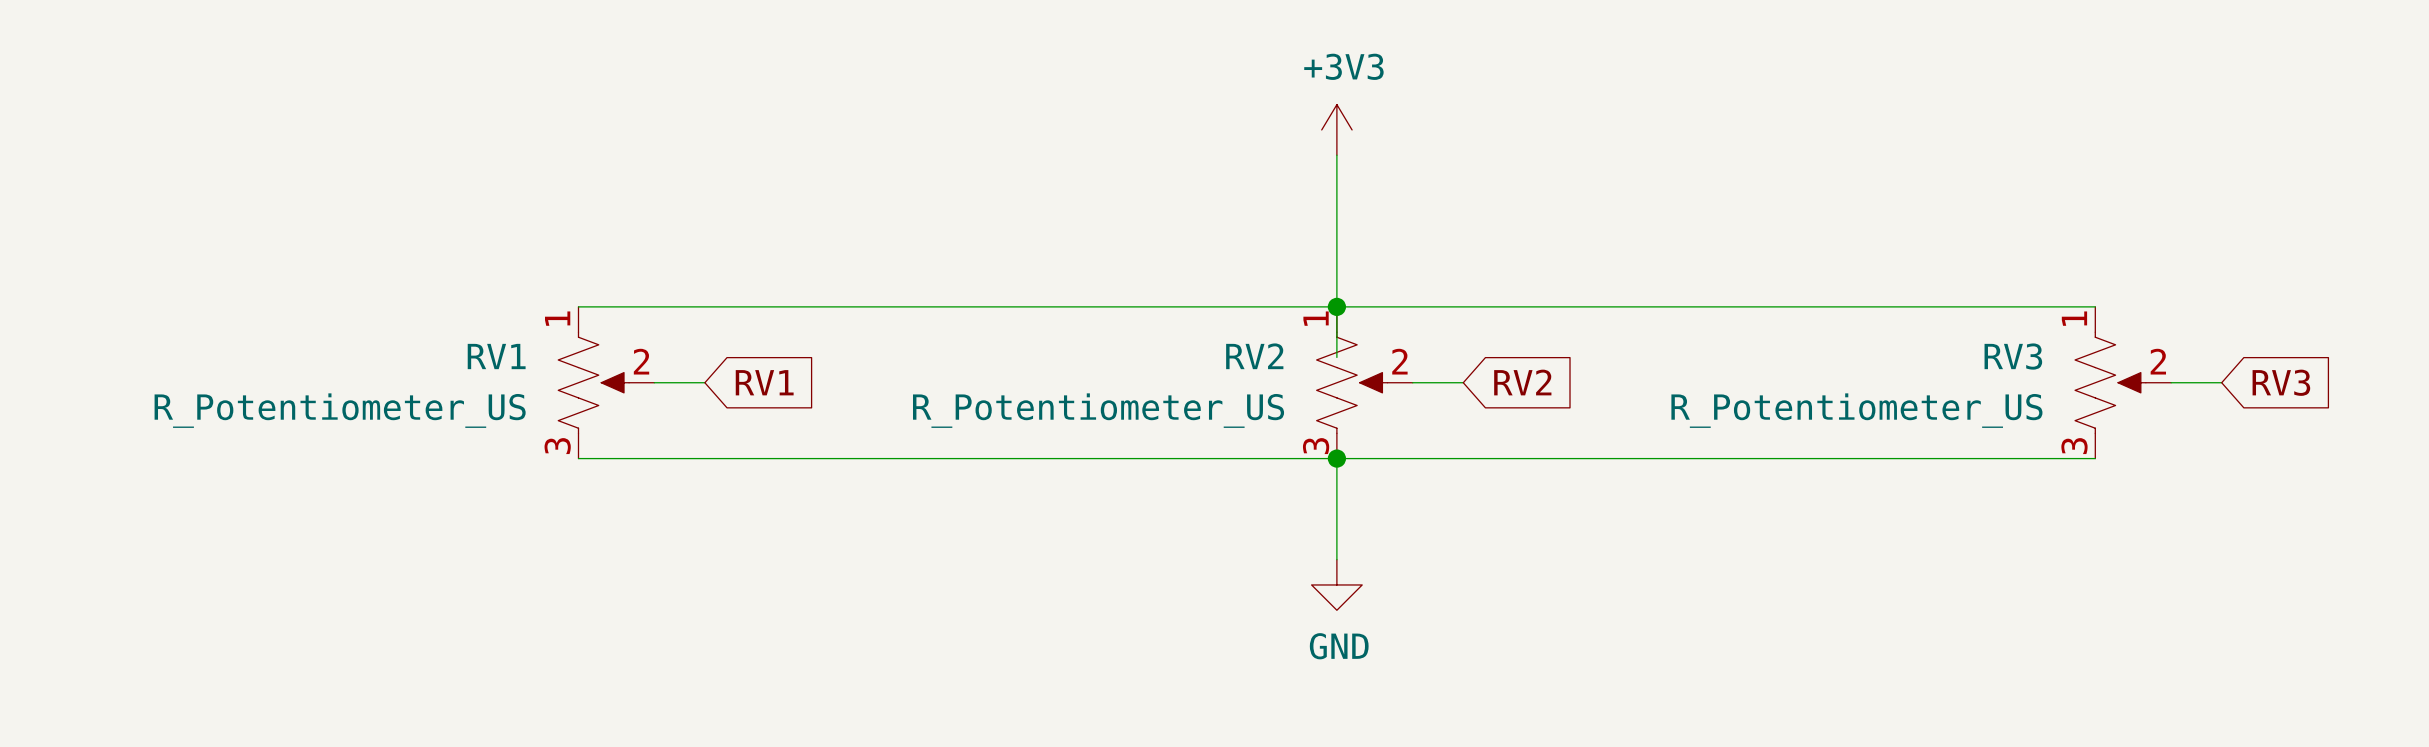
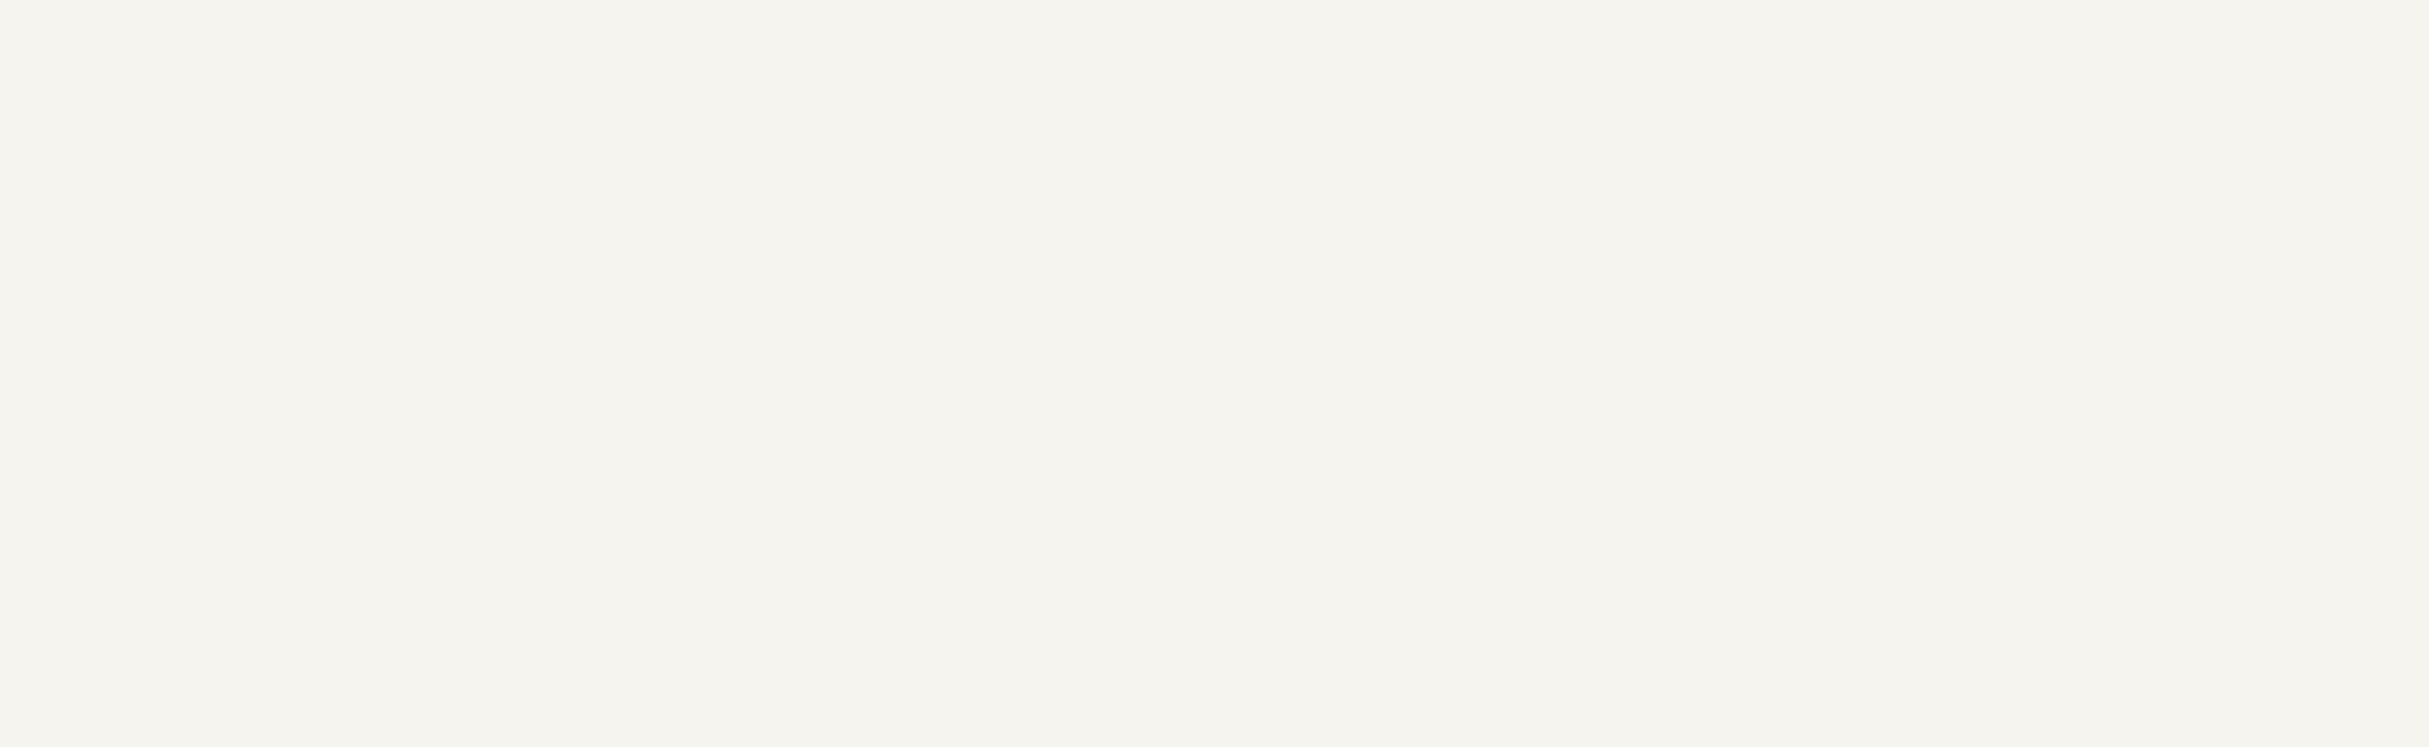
power symbol: +3V3 (1336, 129) -> none
wire: (1336, 155) (1336, 357) -> none
wire: (578, 306) (2095, 306) -> none
junction: (1336, 306) -> none
RV1: R_Potentiometer_US (606, 382) -> none
wire: (654, 382) (704, 382) -> none
global label: RV1 (764, 382) -> none
RV2: R_Potentiometer_US (1364, 382) -> none
wire: (1412, 382) (1463, 382) -> none
global label: RV2 (1522, 382) -> none
RV3: R_Potentiometer_US (2123, 382) -> none
wire: (2171, 382) (2221, 382) -> none
global label: RV3 (2281, 382) -> none
wire: (578, 458) (2095, 458) -> none
wire: (1336, 458) (1336, 559) -> none
junction: (1336, 458) -> none
power symbol: GND (1336, 584) -> none

